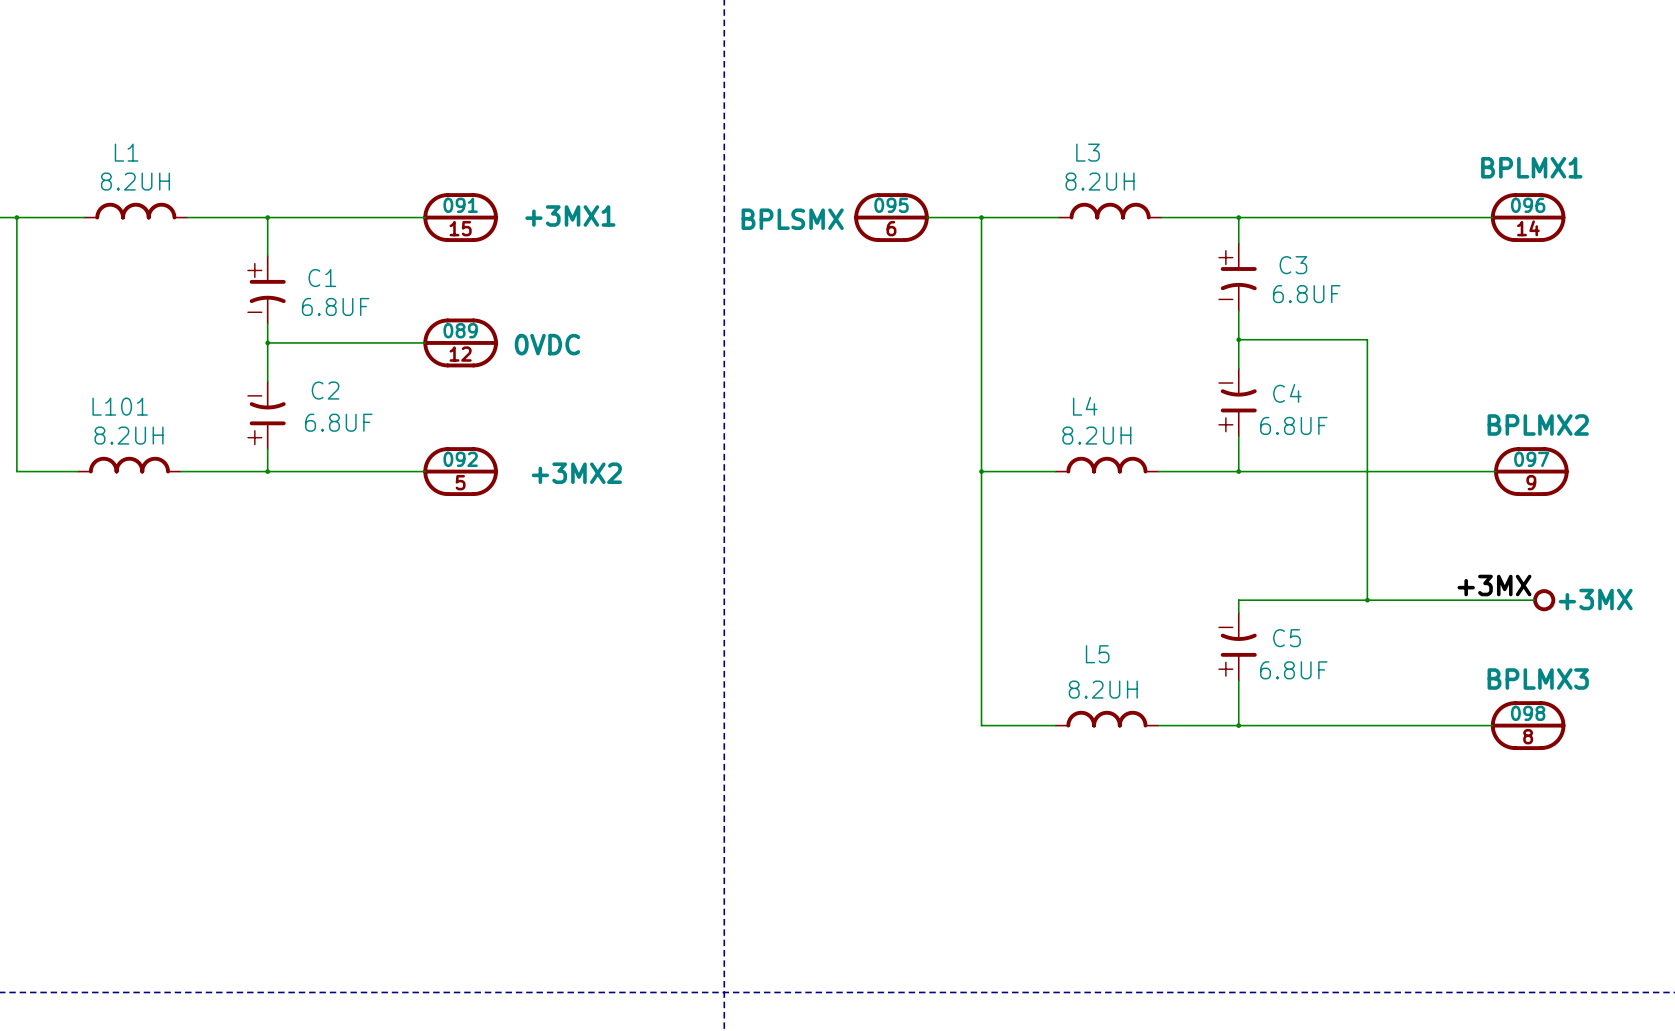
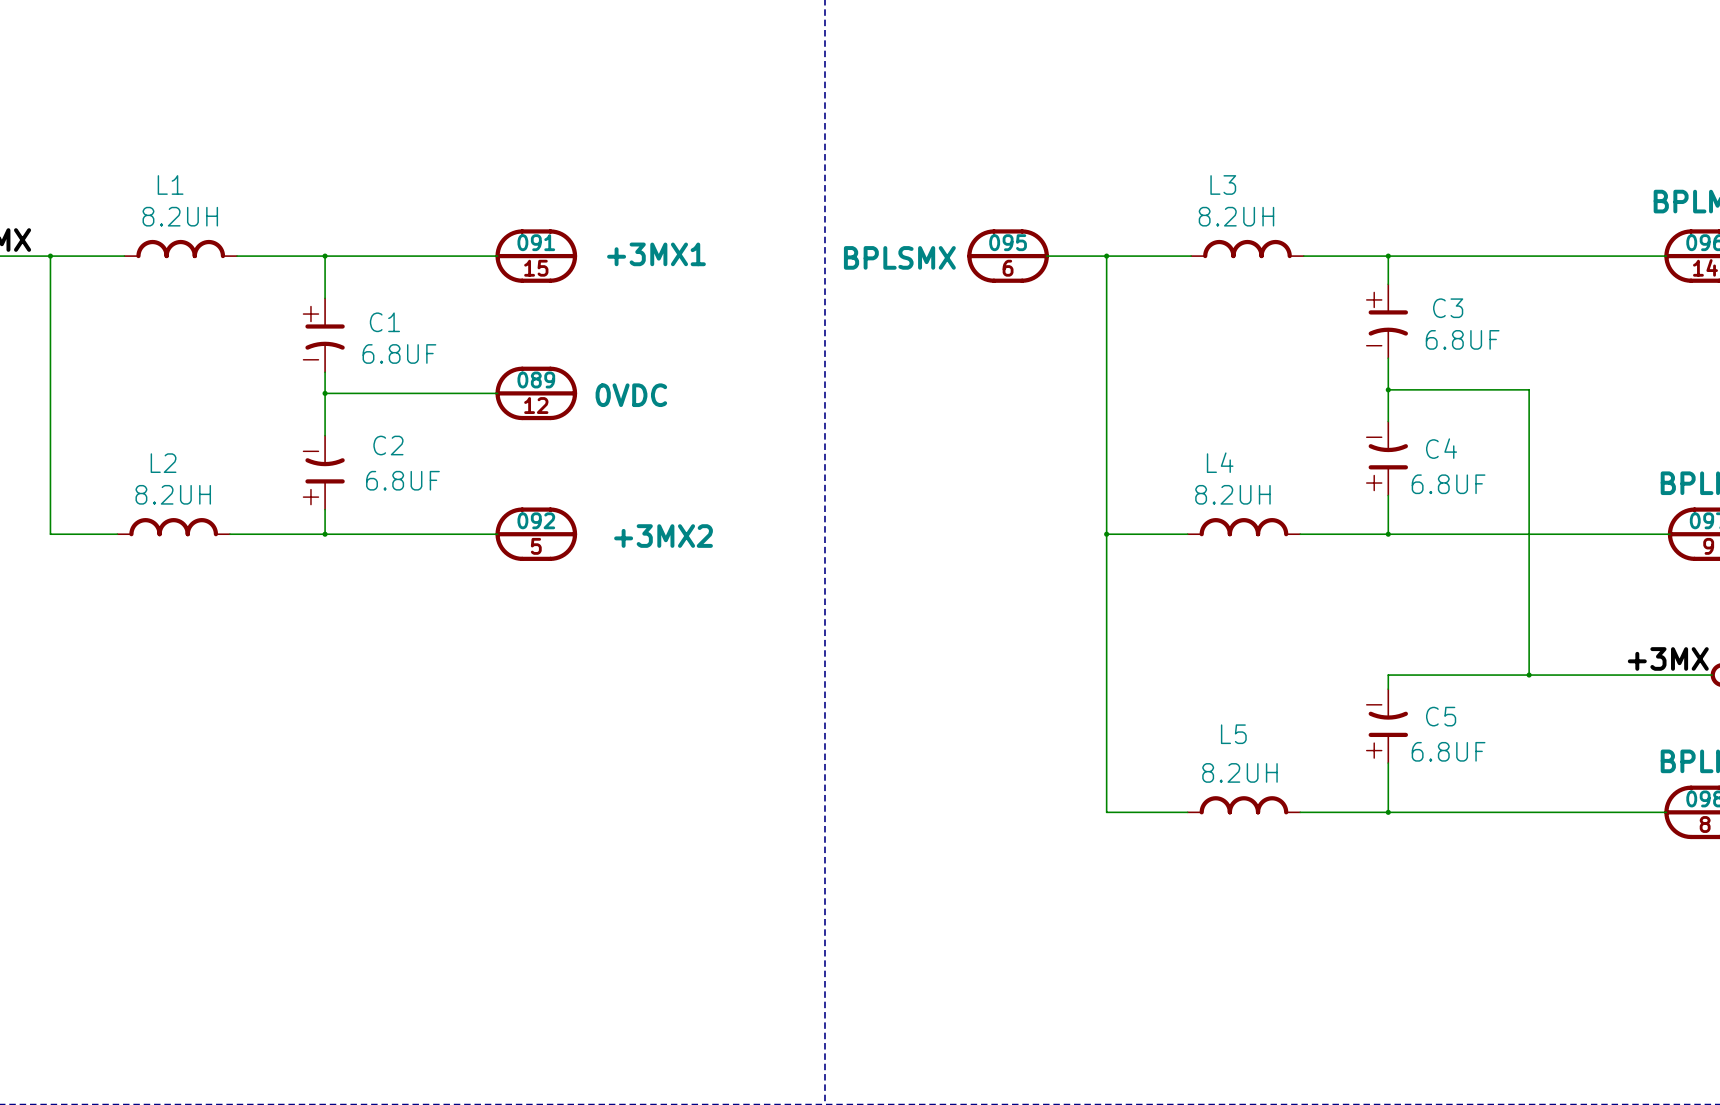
L101 name: L101 (120, 406) -> L2 (163, 463)

